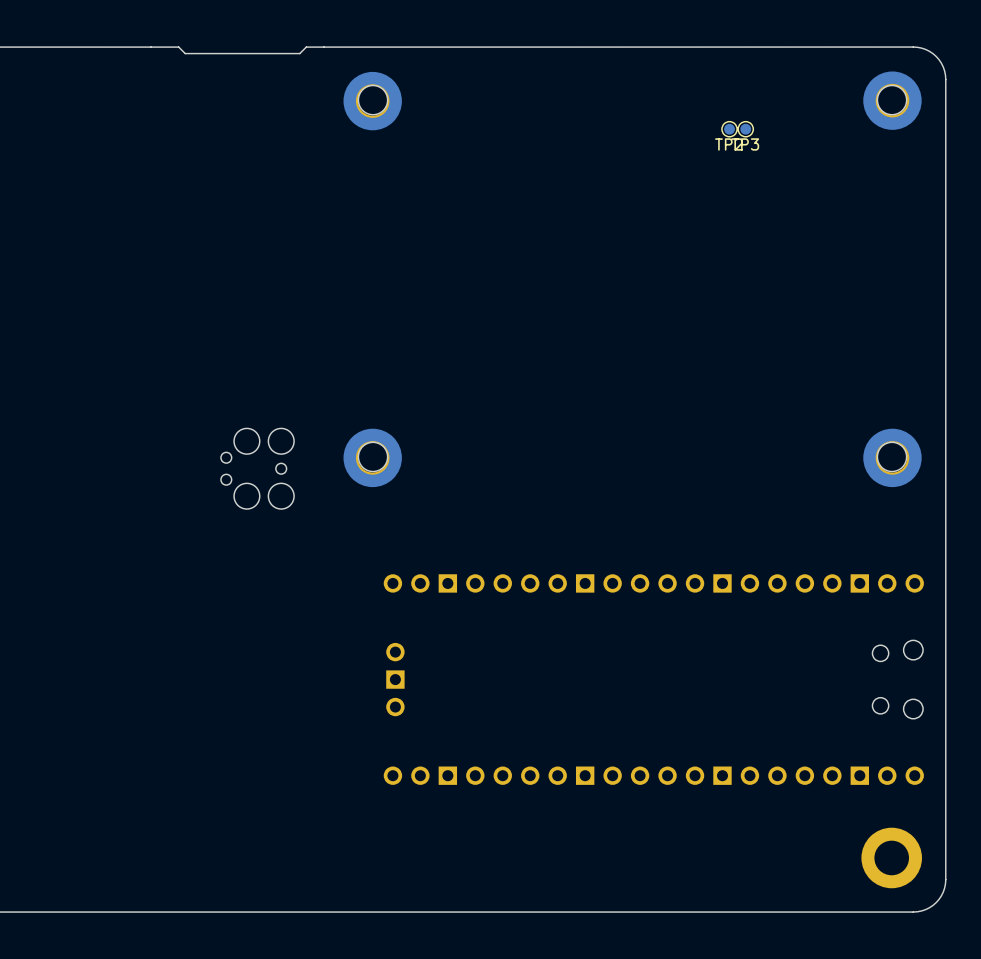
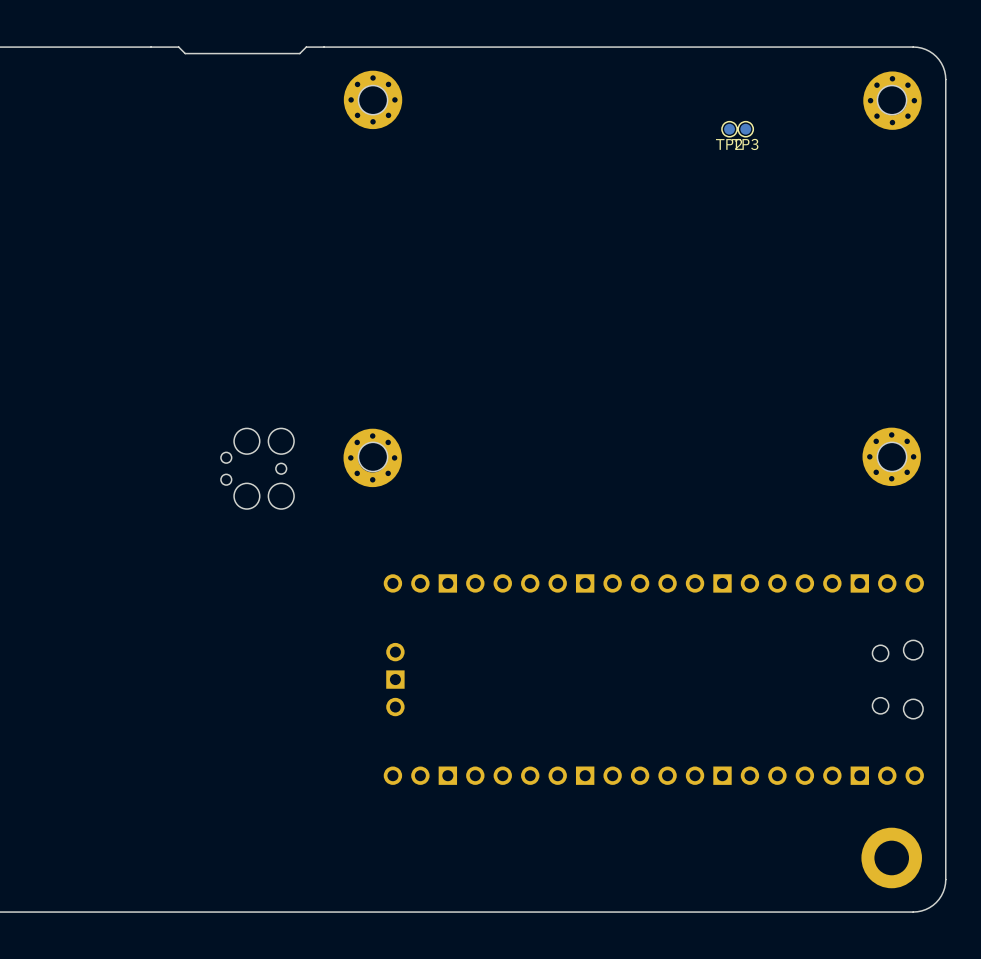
part footprint: [343, 71, 402, 131] -> [343, 70, 403, 130]
part footprint: [863, 71, 922, 130] -> [863, 71, 922, 130]
part footprint: [343, 428, 402, 488] -> [343, 428, 402, 488]
part footprint: [863, 428, 922, 488] -> [862, 427, 921, 487]

